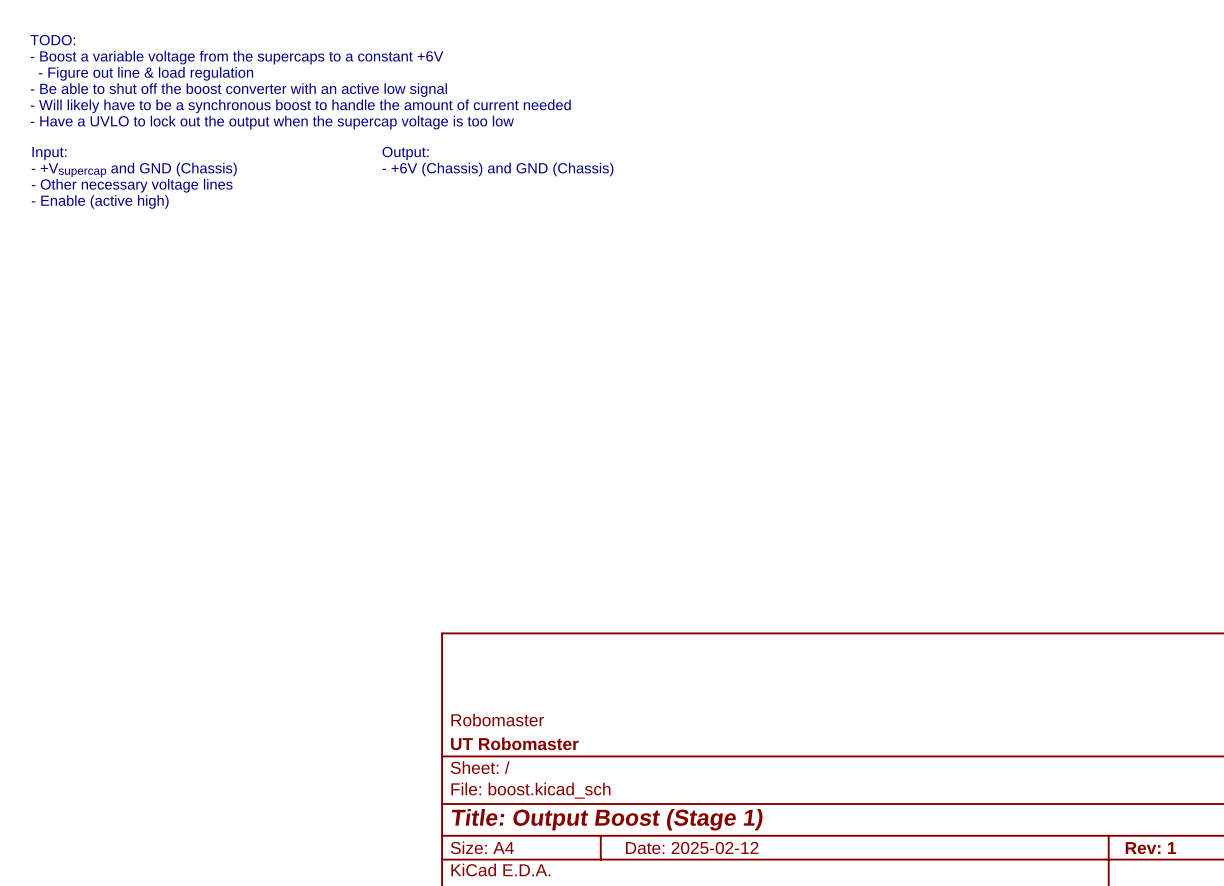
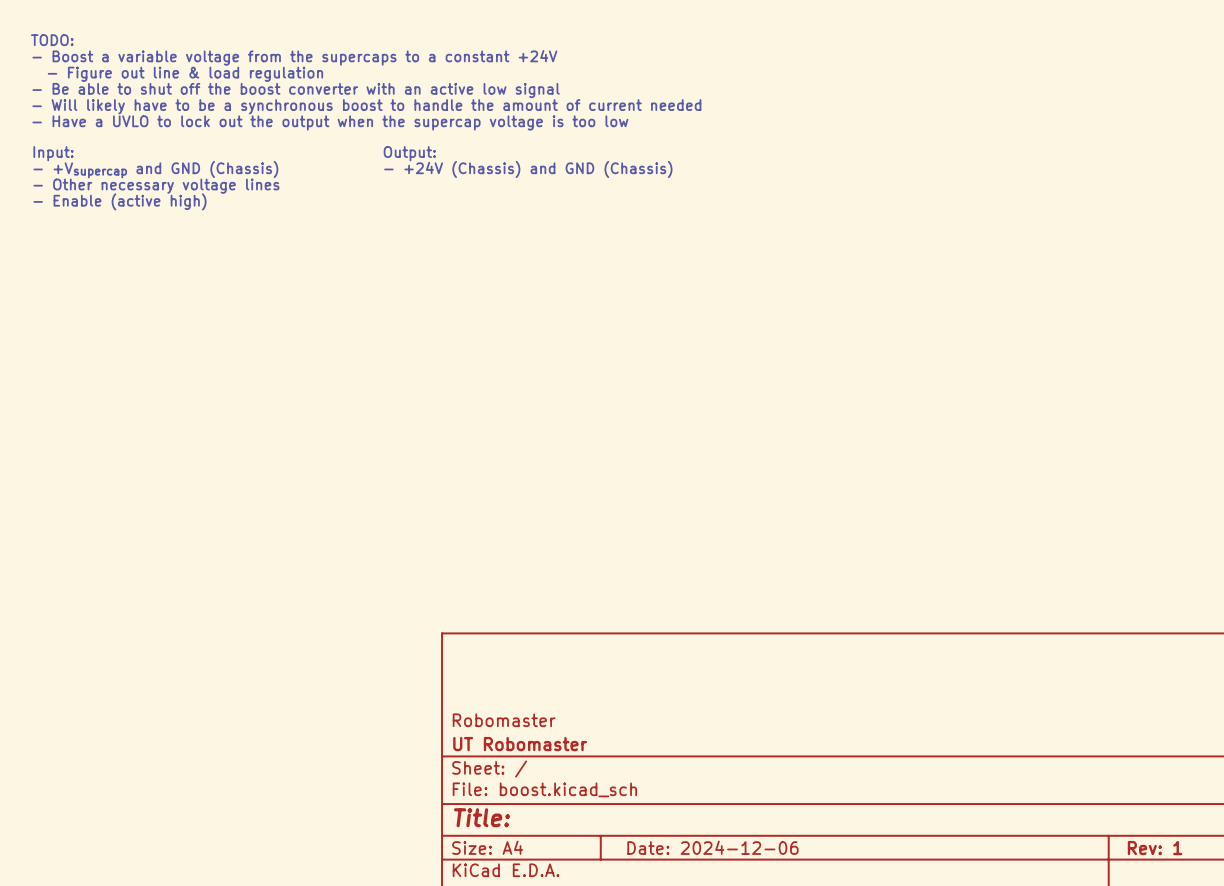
text: - Boost a variable voltage from the supercaps to a constant +6V (237, 57) -> - Boost a variable voltage from the supercaps to a constant +24V (294, 57)
text: - +6V (Chassis) and GND (Chassis) (497, 169) -> - +24V (Chassis) and GND (Chassis) (528, 169)
title block: Title: Output Boost (Stage 1) (607, 819) -> Title: (481, 817)
title block: Date: 2025-02-12 (692, 848) -> Date: 2024-12-06 (712, 847)

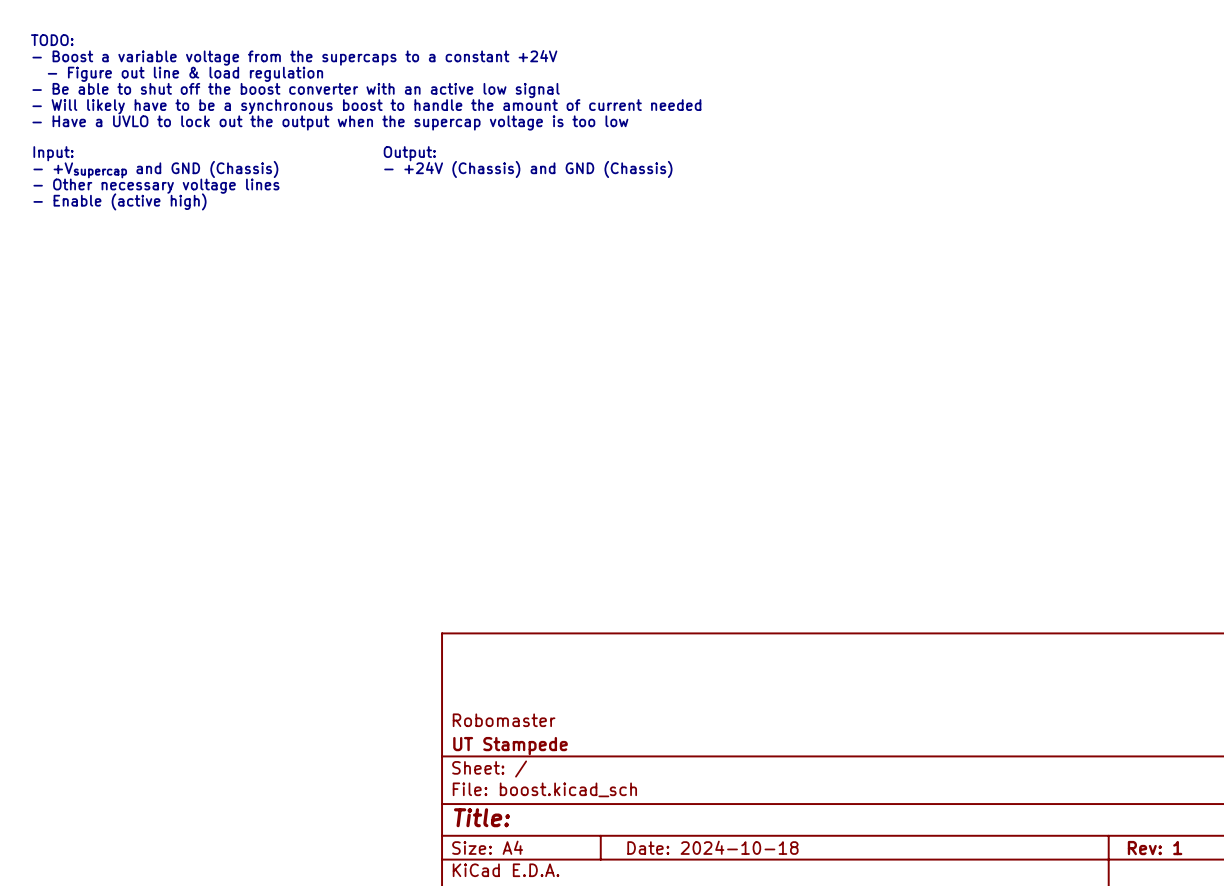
title block: UT Robomaster (520, 744) -> UT Stampede (510, 746)
title block: Date: 2024-12-06 (712, 847) -> Date: 2024-10-18 (712, 847)

